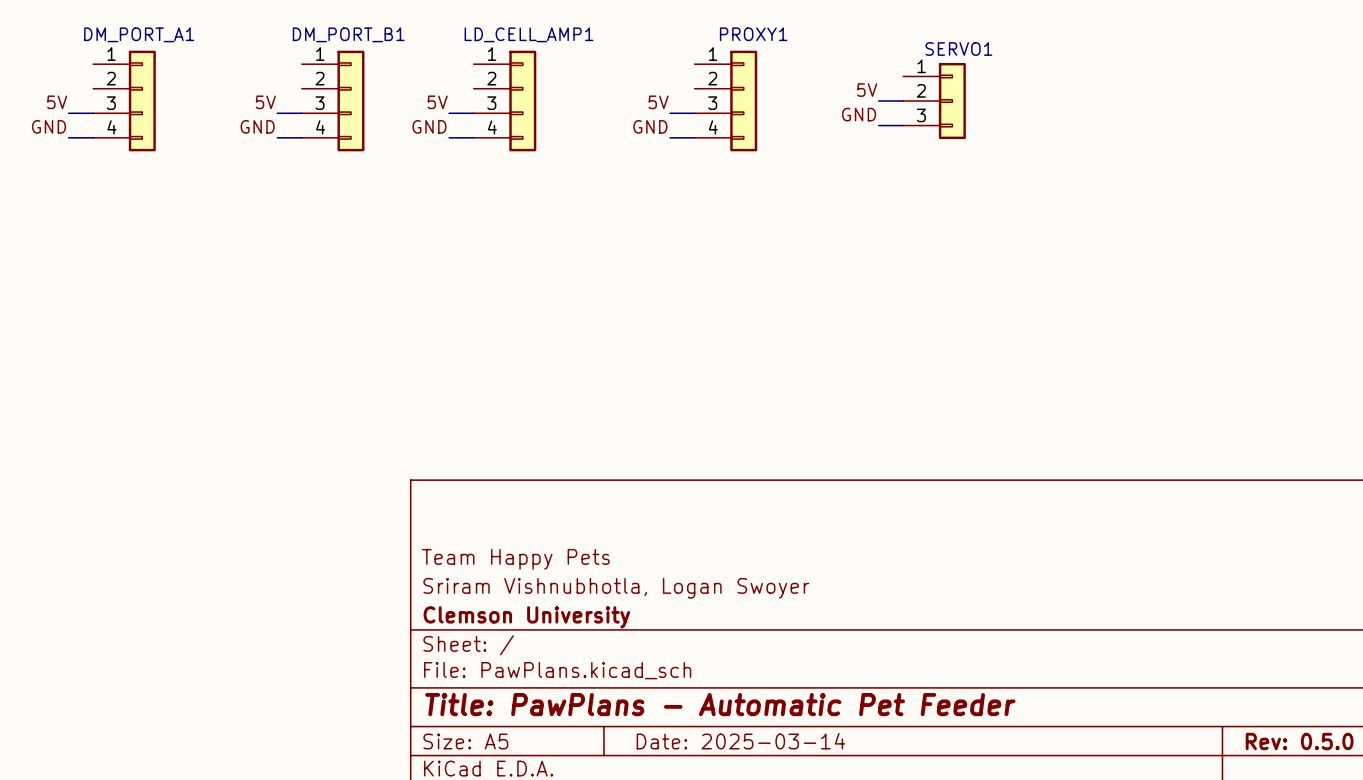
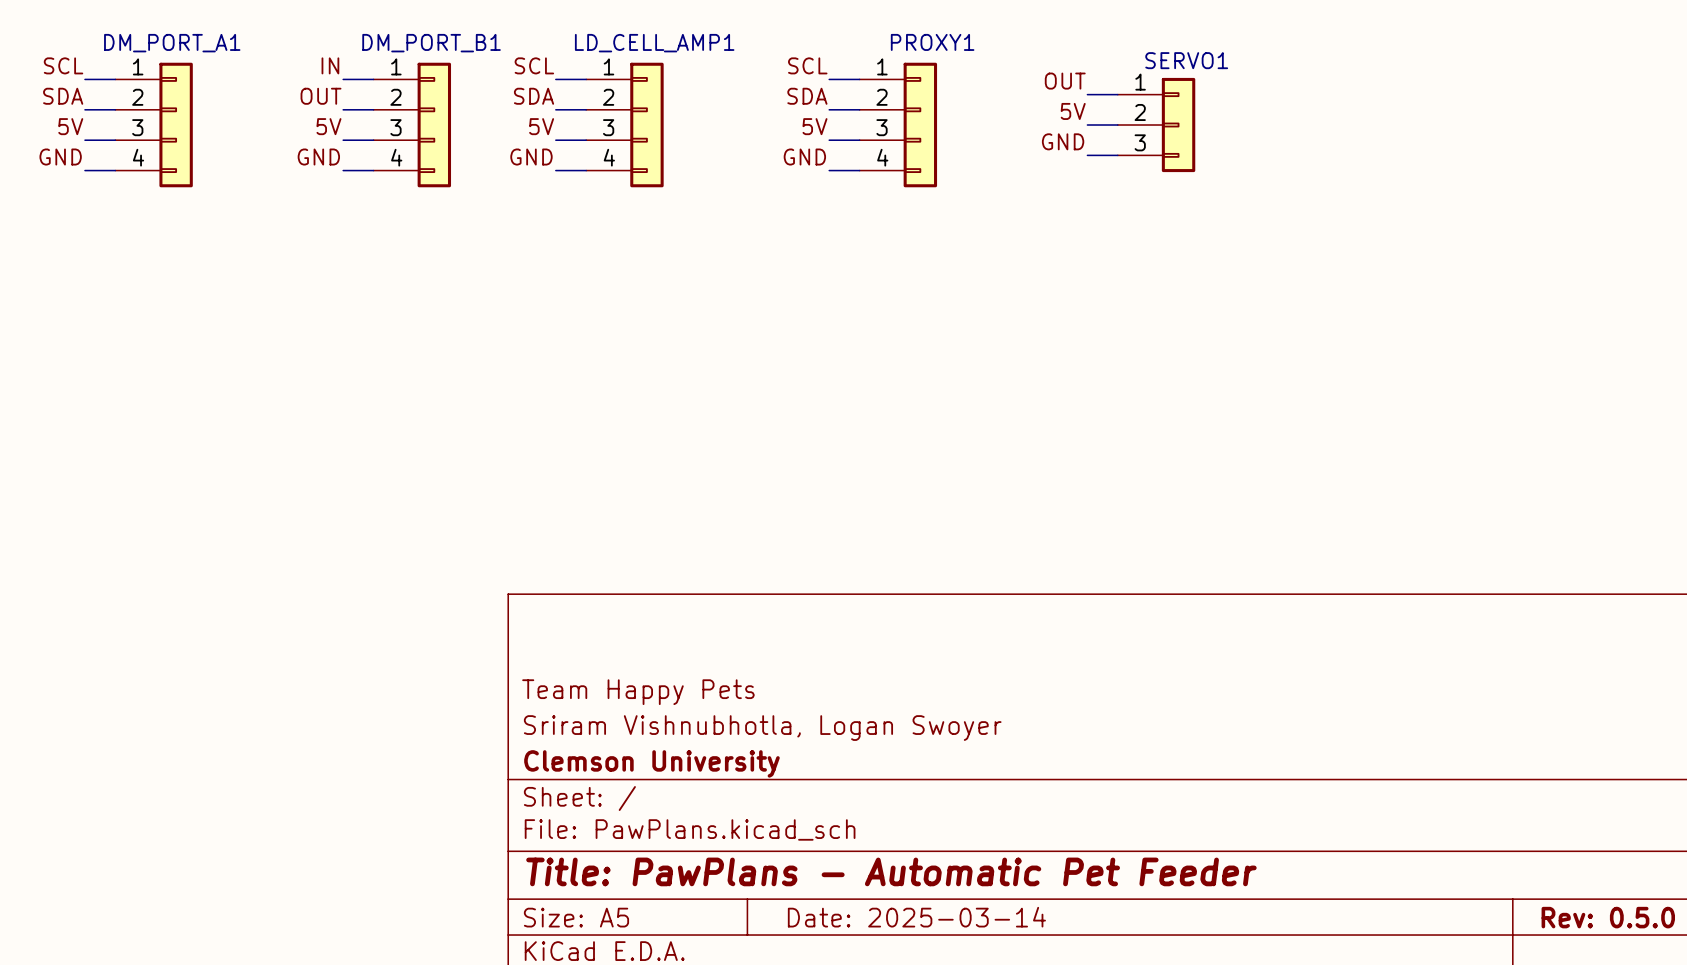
label: none -> SCL (63, 65)
label: none -> IN (330, 65)
label: none -> SCL (534, 65)
label: none -> SCL (807, 65)
wire: none -> (84, 79) (115, 79)
wire: none -> (343, 79) (373, 79)
wire: none -> (555, 79) (586, 79)
wire: none -> (829, 79) (859, 79)
label: none -> OUT (1065, 81)
wire: none -> (1087, 94) (1117, 94)
label: none -> SDA (63, 96)
label: none -> OUT (321, 96)
label: none -> SDA (534, 96)
label: none -> SDA (807, 96)
wire: none -> (84, 109) (115, 109)
wire: none -> (343, 109) (373, 109)
wire: none -> (555, 109) (586, 109)
wire: none -> (829, 109) (859, 109)

